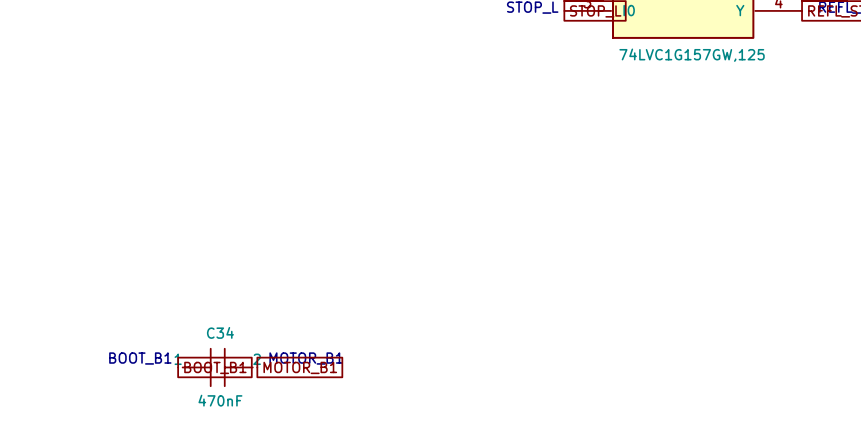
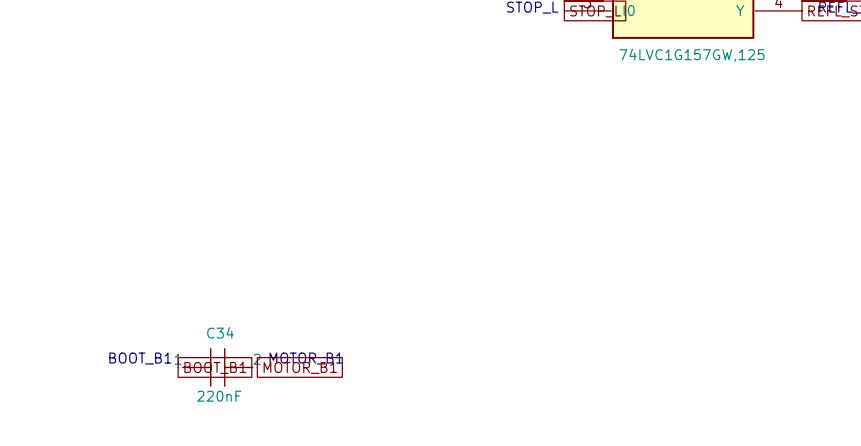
C34 value: 470nF (220, 400) -> 220nF (219, 396)

